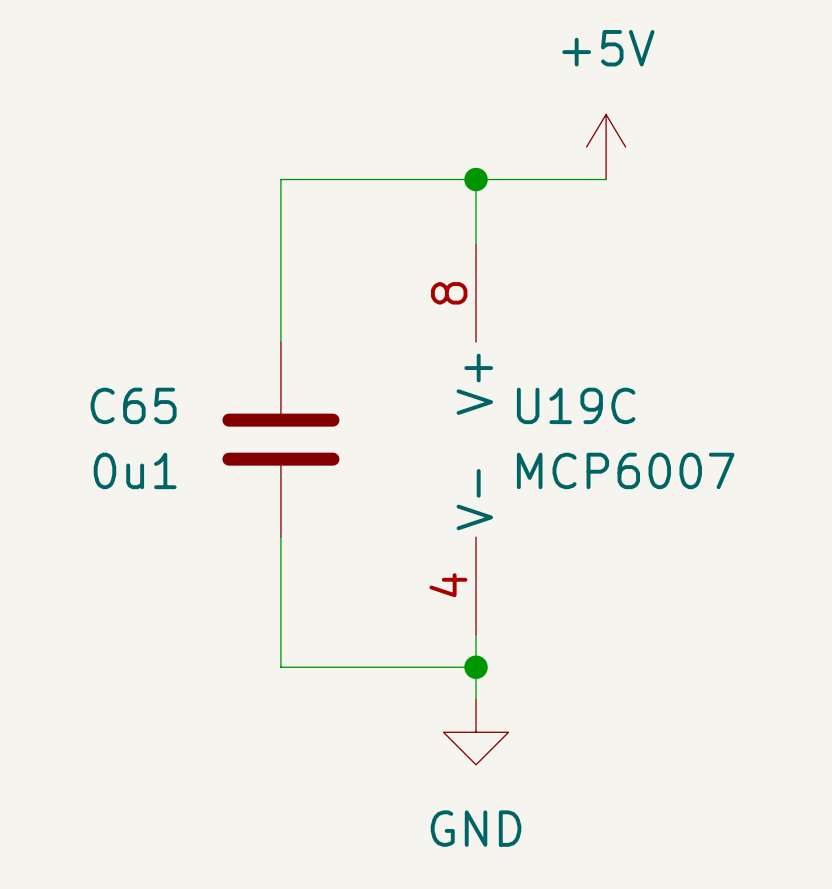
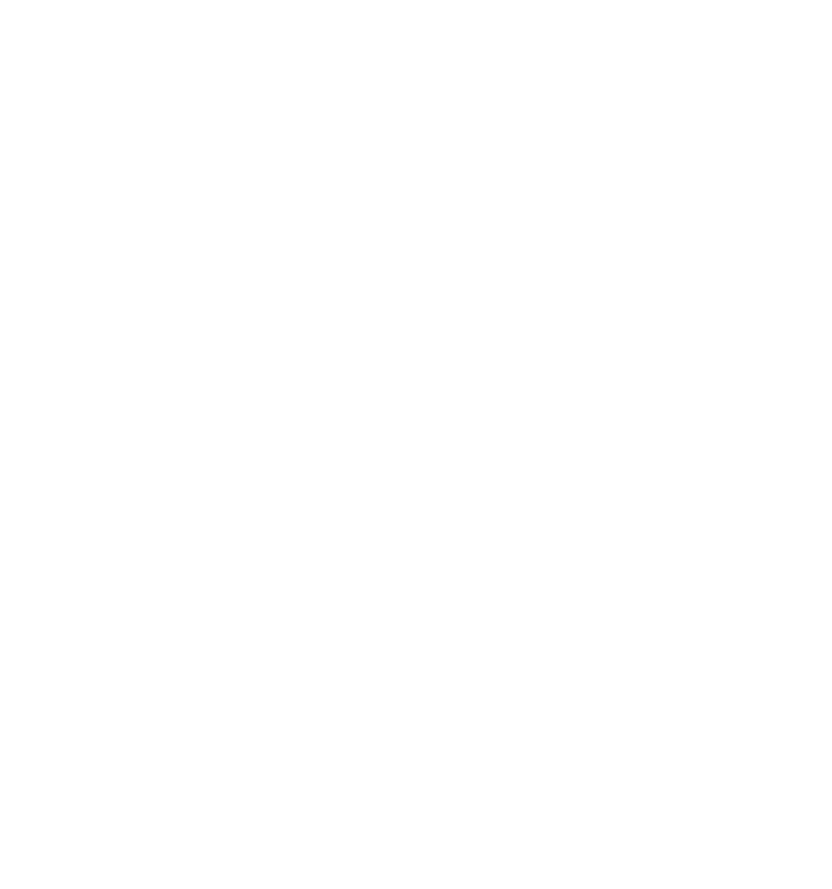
power symbol: +5V (606, 147) -> none
wire: (476, 179) (476, 244) -> none
junction: (476, 179) -> none
wire: (606, 179) (280, 179) (280, 342) -> none
C65: 0u1 (280, 439) -> none
U19C: MCP6007 (476, 439) -> none
wire: (280, 537) (280, 667) (476, 667) -> none
wire: (476, 634) (476, 699) -> none
junction: (476, 667) -> none
power symbol: GND (476, 732) -> none

